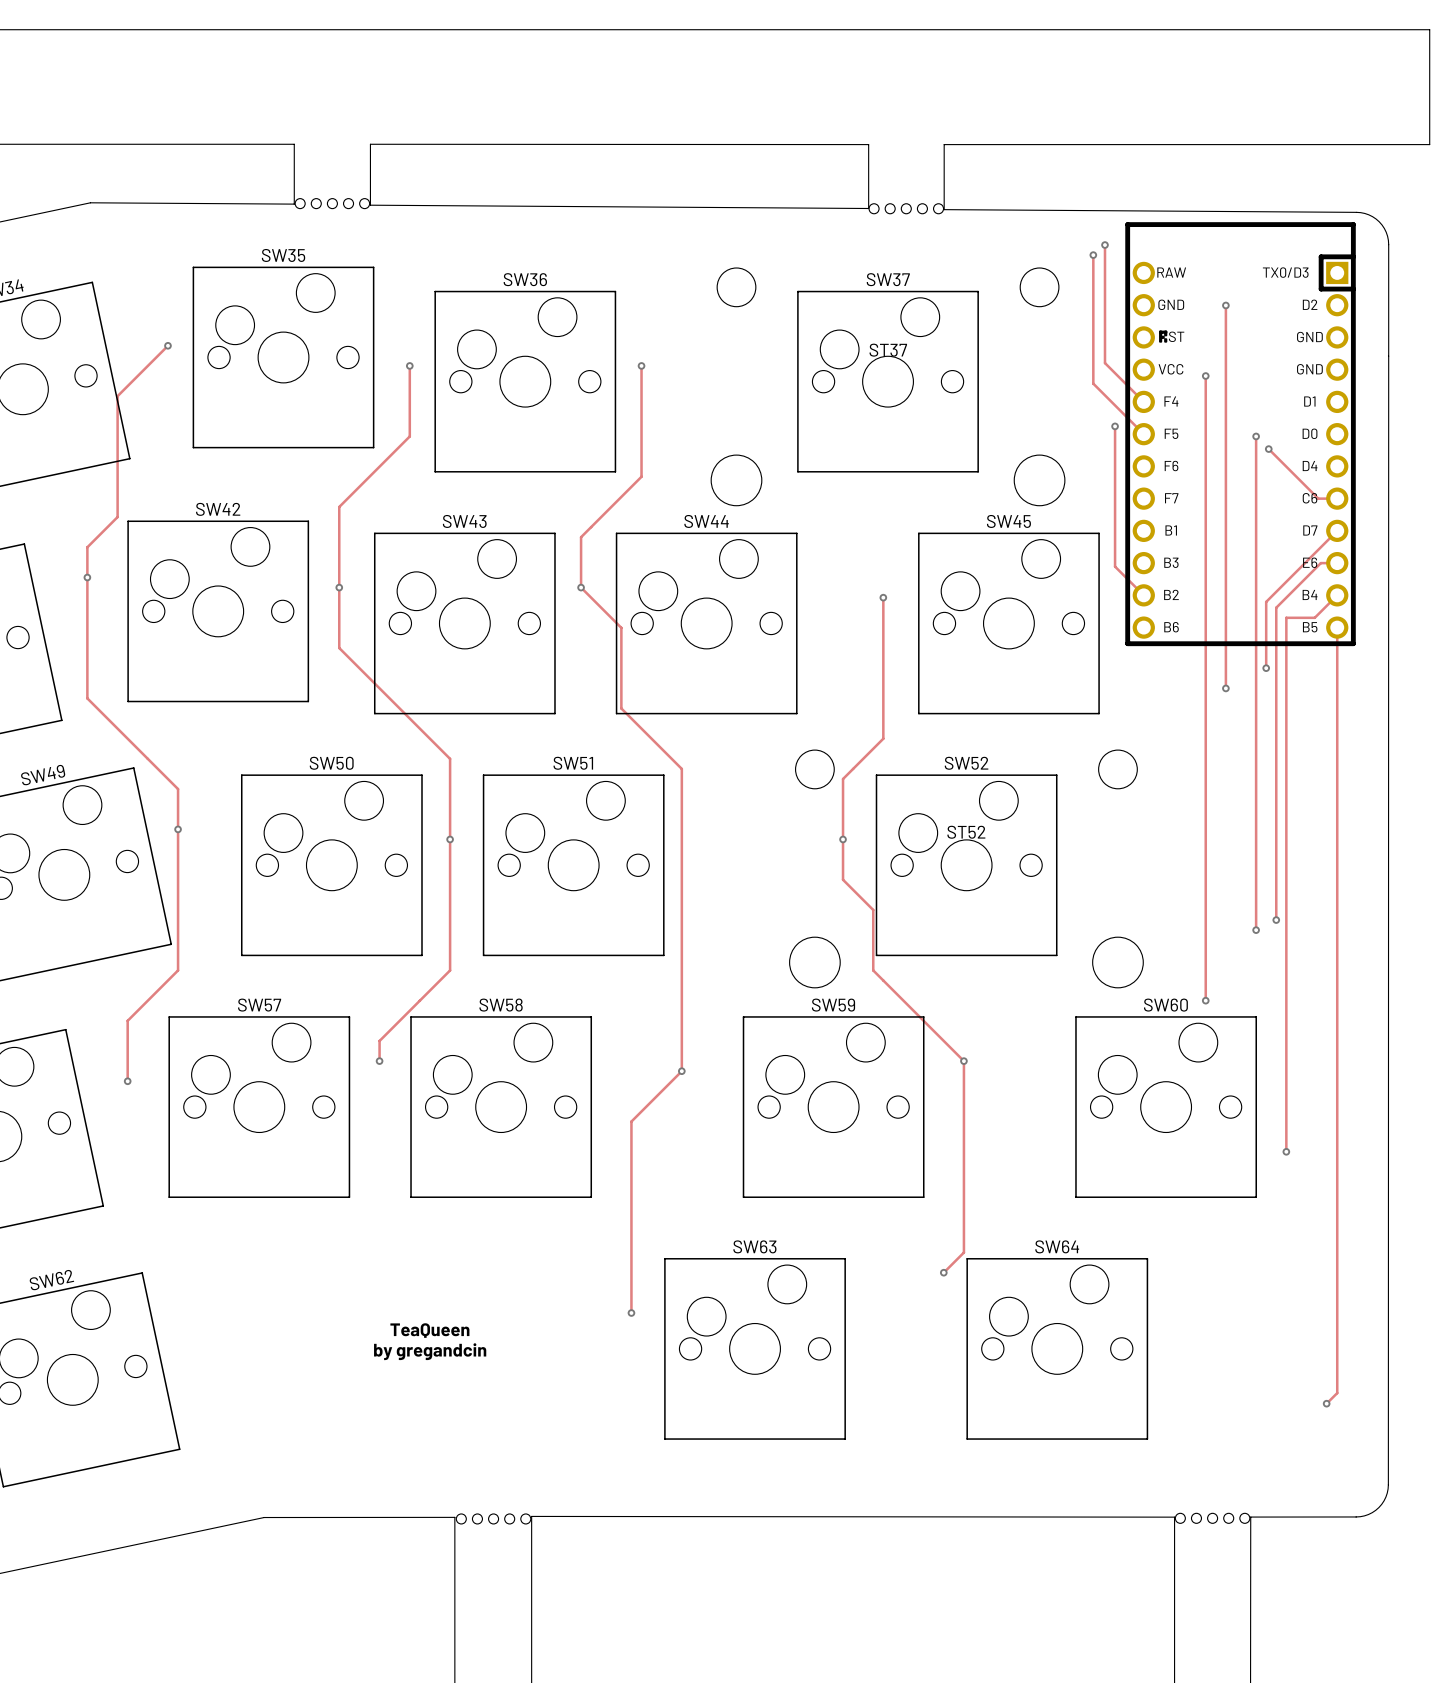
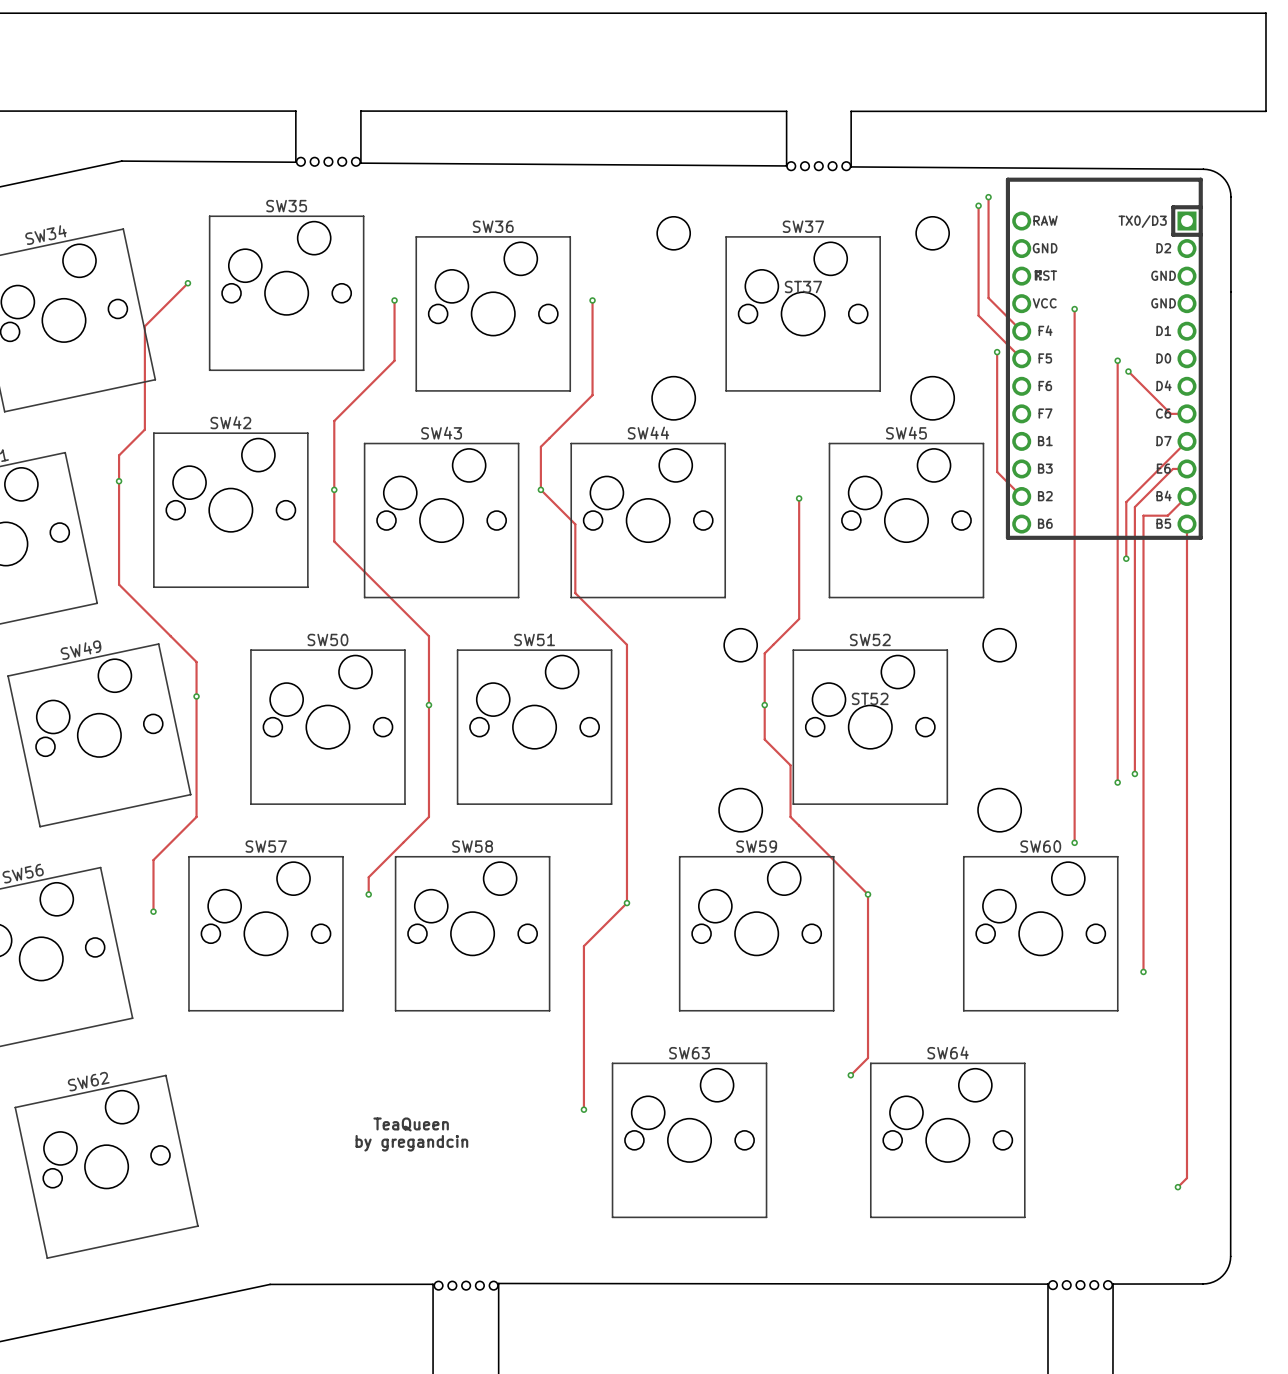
track: (1225, 305) (1225, 688) -> none
via: (1225, 305) -> none
via: (1225, 688) -> none

